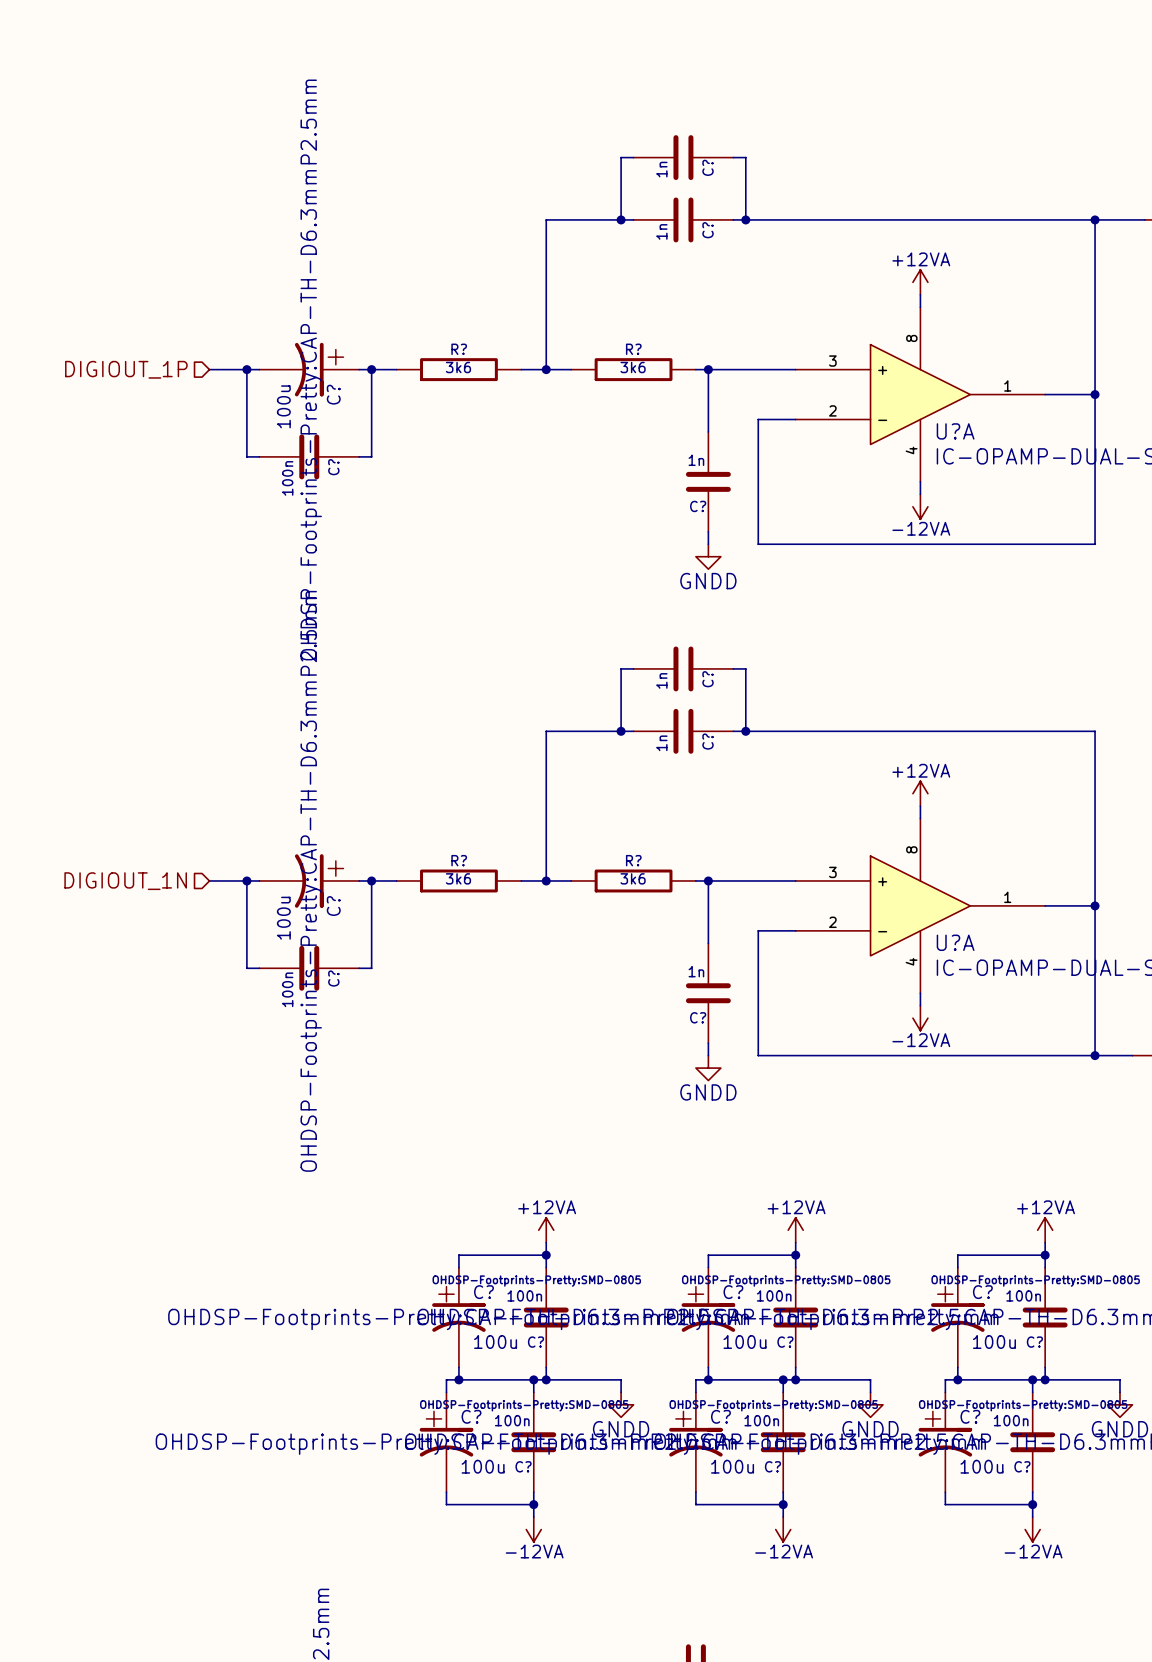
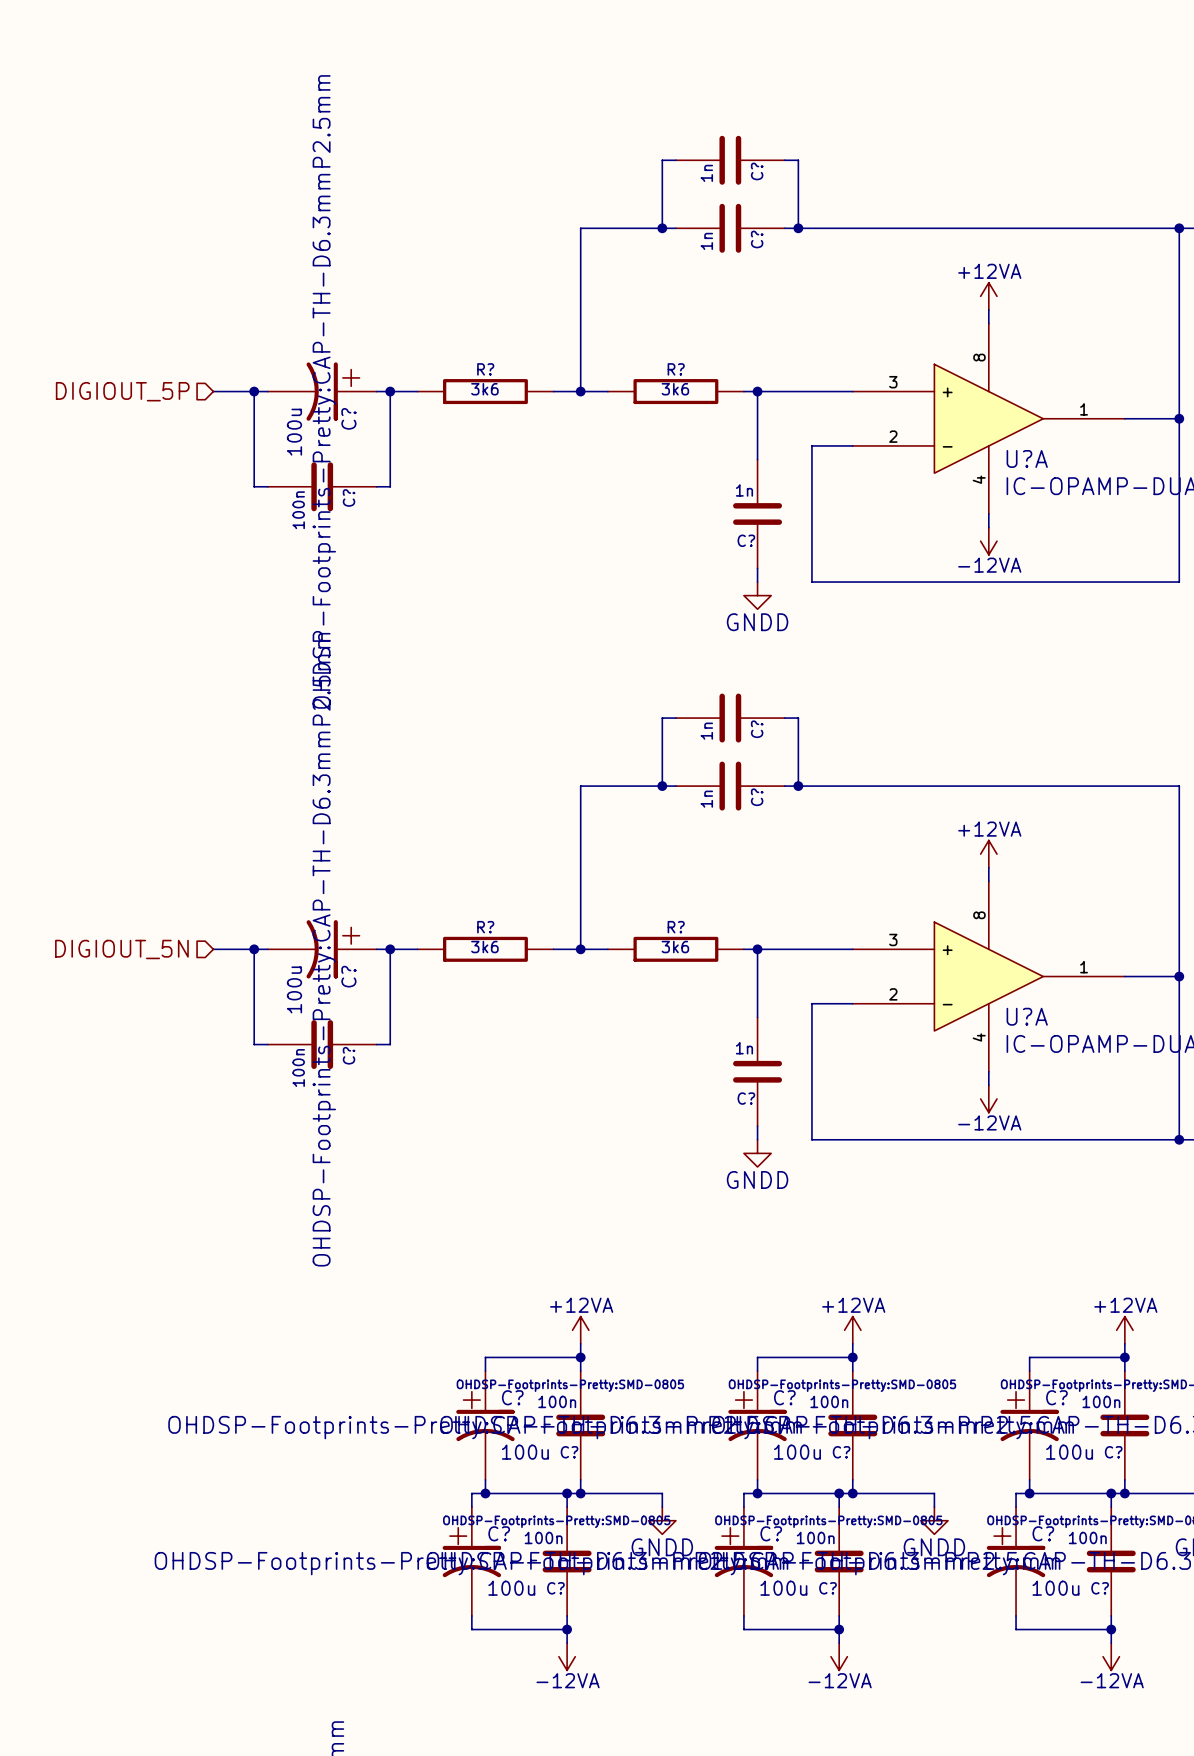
hierarchical label: DIGIOUT_1P (126, 369) -> DIGIOUT_5P (122, 391)
hierarchical label: DIGIOUT_1N (125, 881) -> DIGIOUT_5N (121, 949)

